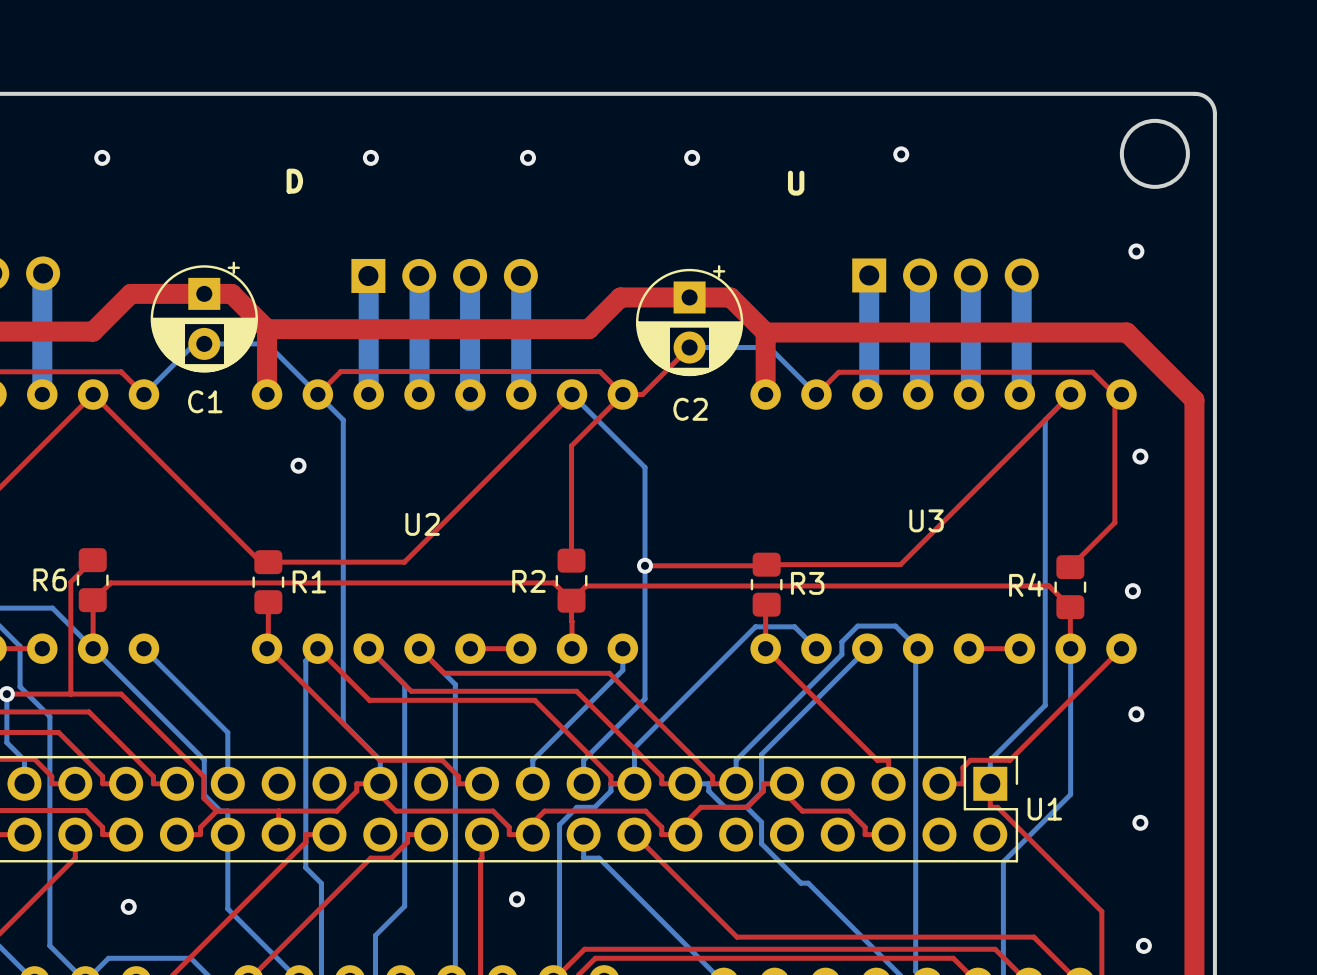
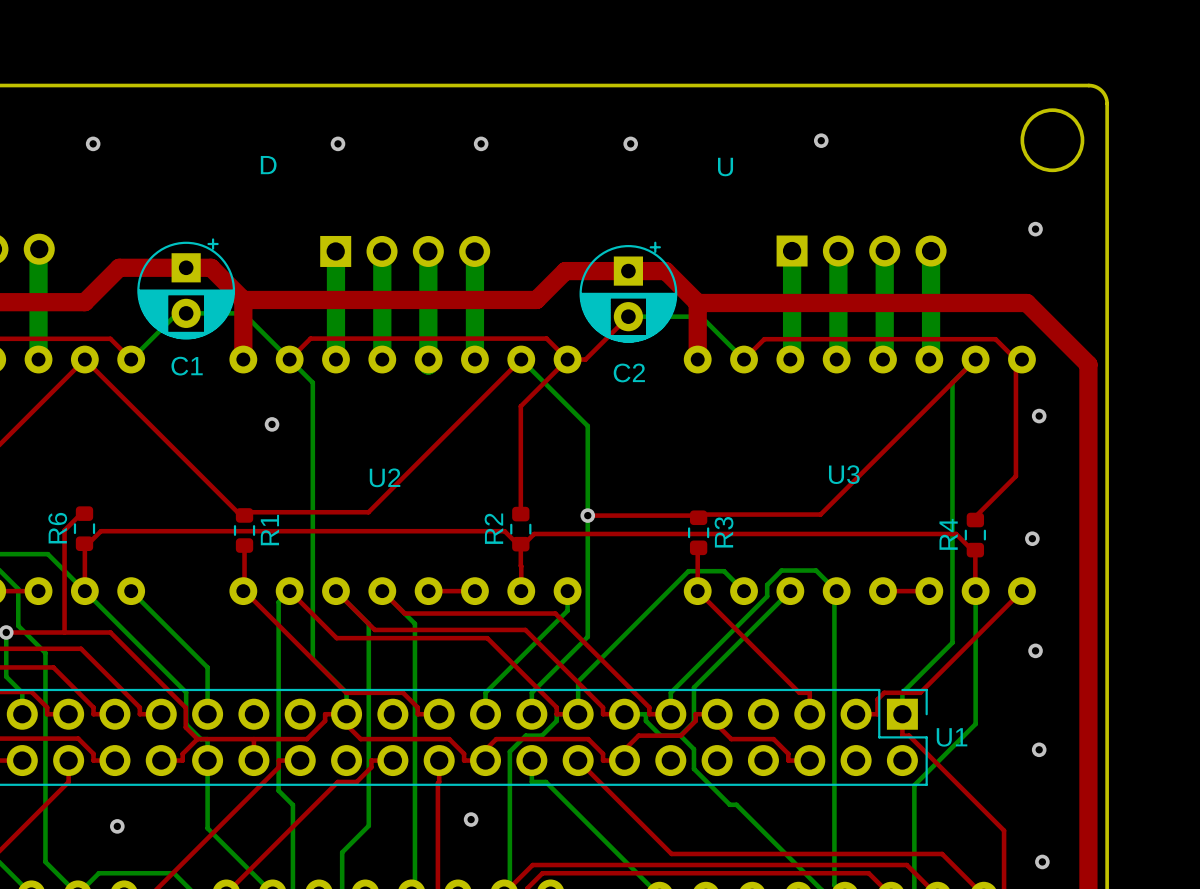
R6 footprint: [76, 548, 109, 613] -> [73, 506, 96, 552]
R2 footprint: [555, 548, 588, 613] -> [510, 506, 532, 552]
R1 footprint: [252, 550, 285, 615] -> [233, 508, 256, 553]
R3 footprint: [750, 552, 783, 617] -> [688, 510, 710, 556]
R4 footprint: [1054, 555, 1087, 620] -> [964, 512, 986, 558]
R6 name rotation: 0° (50, 579) -> 90° counterclockwise (57, 528)
R1 name rotation: 0° (309, 581) -> 90° counterclockwise (269, 530)
R2 name rotation: 0° (528, 581) -> 90° counterclockwise (493, 528)
R3 name rotation: 0° (807, 583) -> 90° counterclockwise (724, 532)
R4 name rotation: 0° (1026, 584) -> 90° counterclockwise (948, 534)

